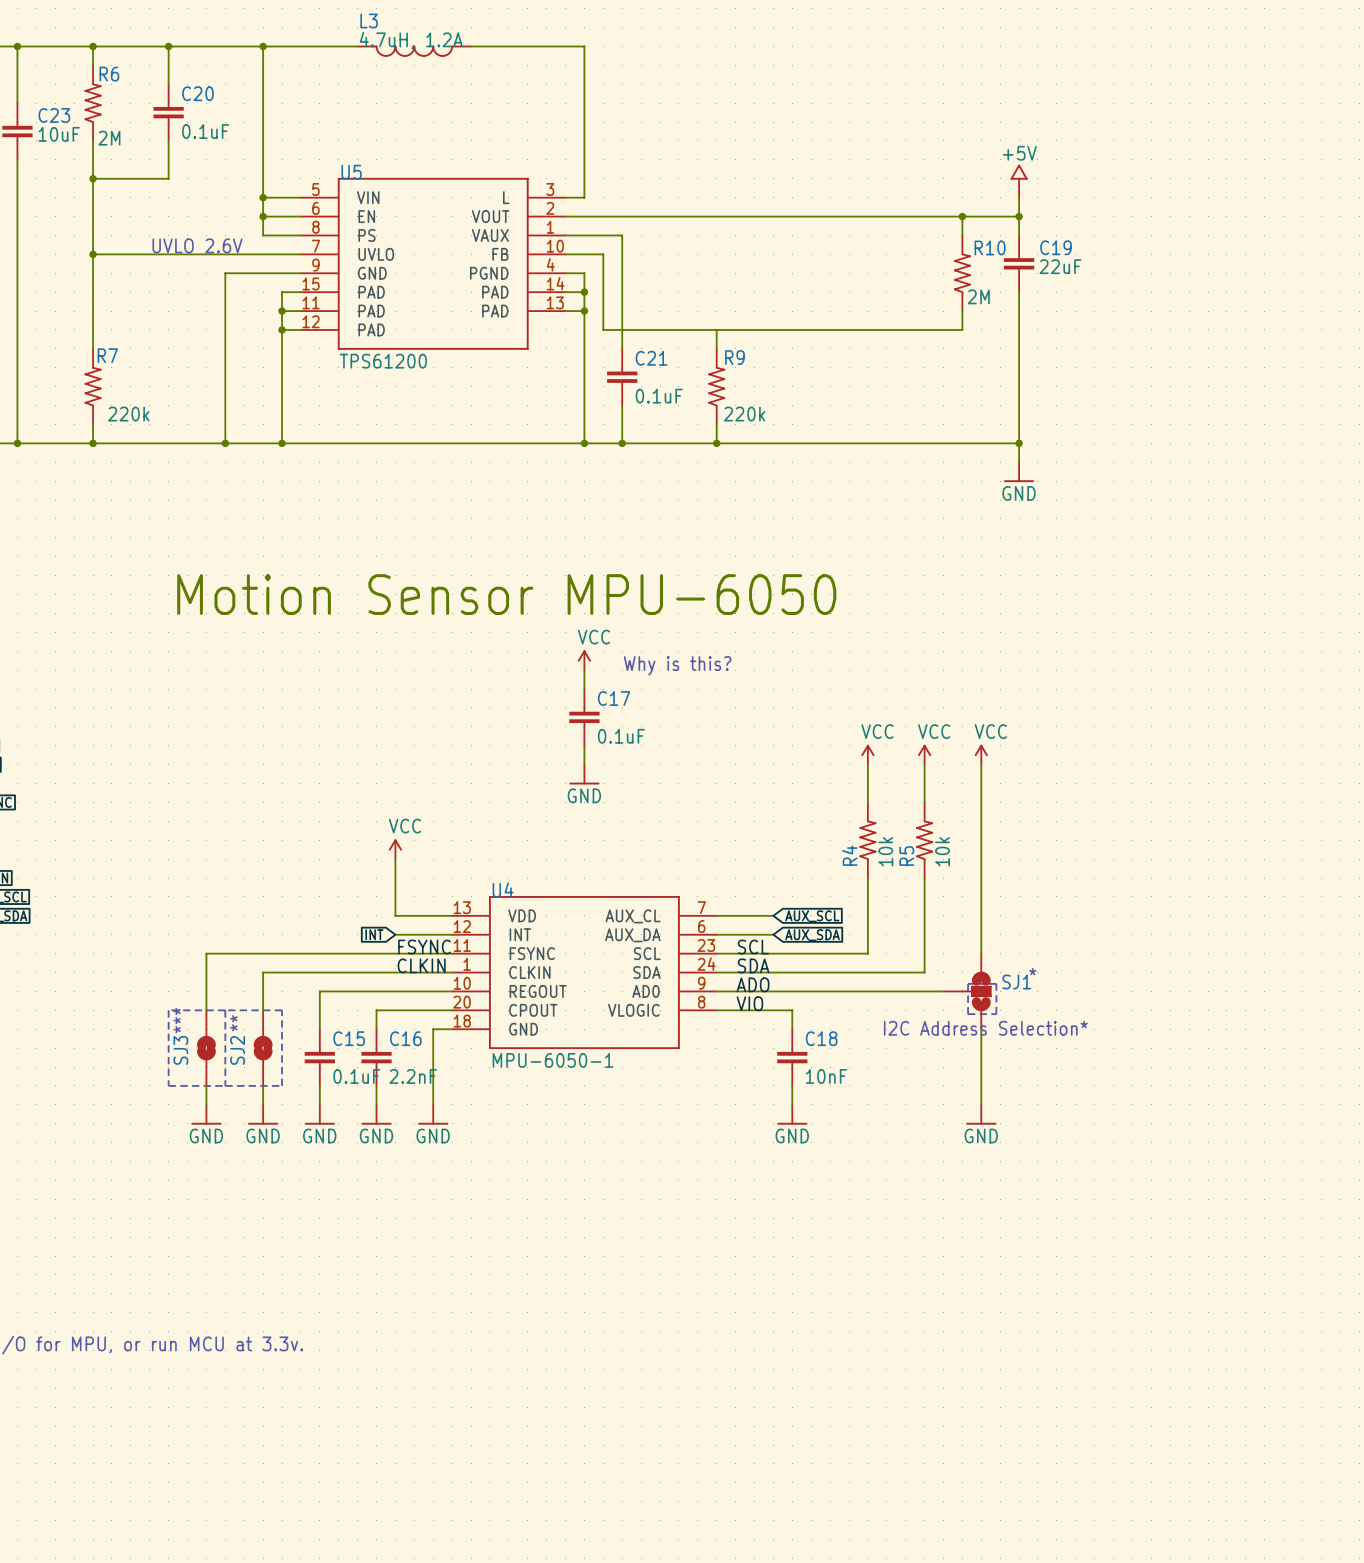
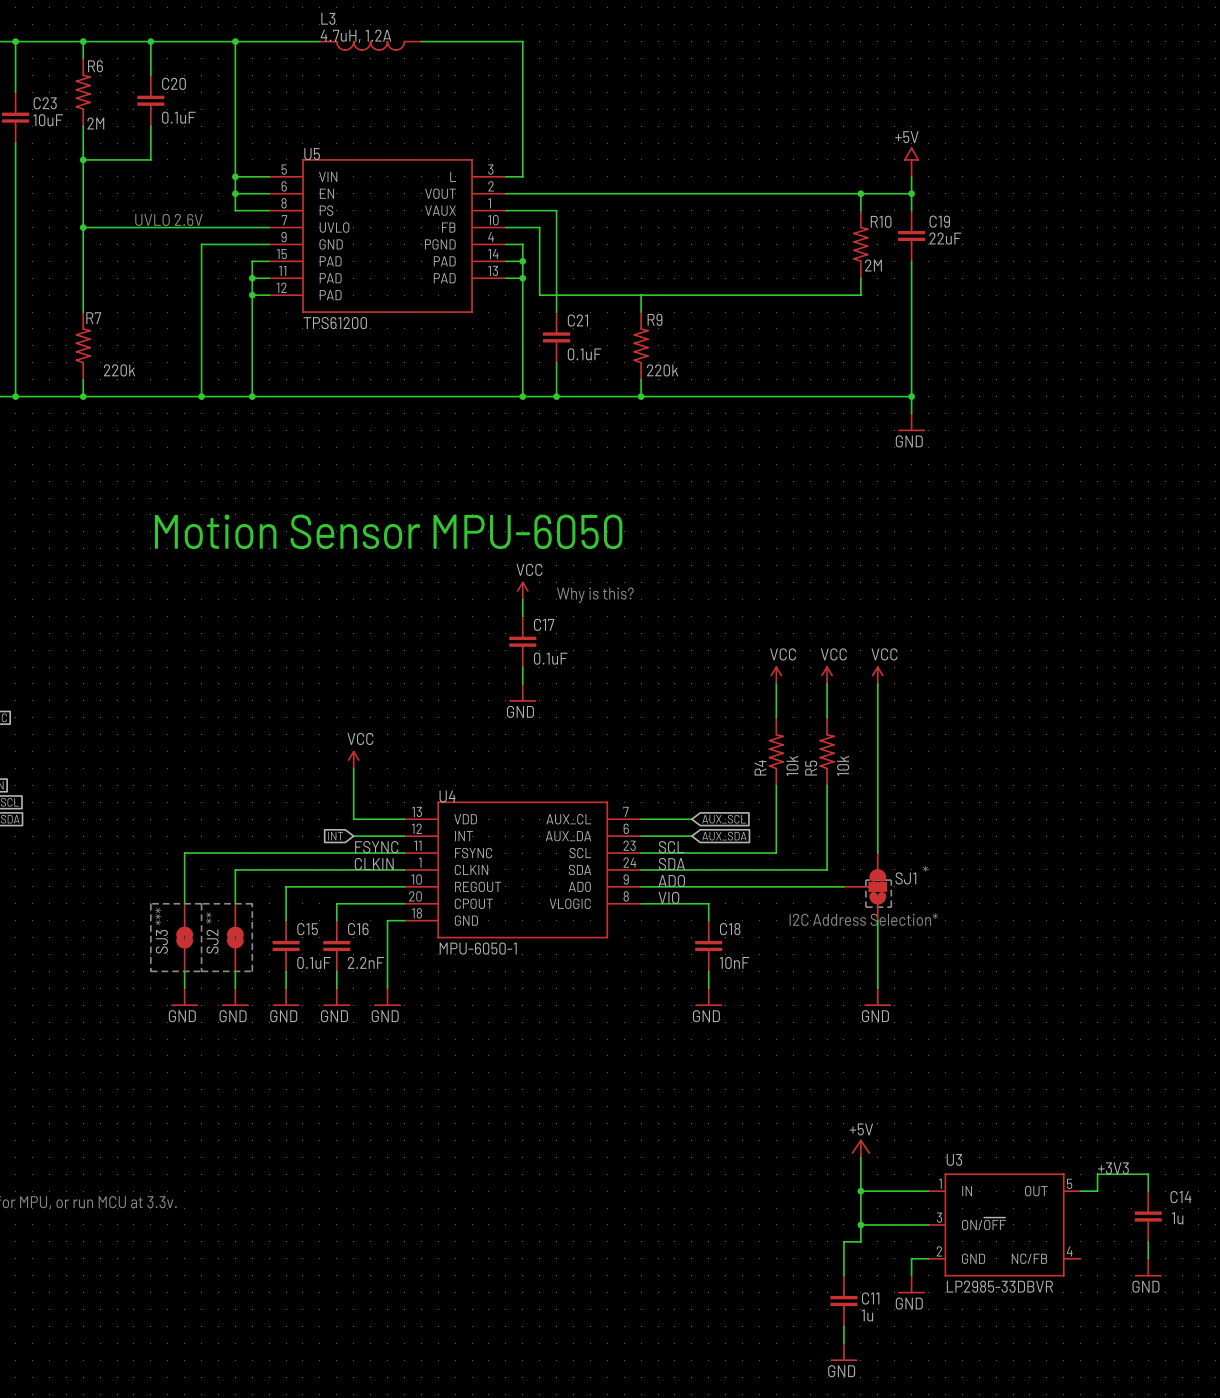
power symbol: none -> +5V (860, 1148)
wire: none -> (860, 1157) (860, 1241) (843, 1241) (843, 1275)
label: none -> +3V3 (1113, 1168)
wire: none -> (860, 1191) (928, 1191)
junction: none -> (860, 1191)
wire: none -> (1080, 1191) (1097, 1191) (1097, 1174) (1148, 1174) (1148, 1191)
C14: none -> 1u (1148, 1216)
wire: none -> (860, 1224) (928, 1224)
junction: none -> (860, 1224)
U3: none -> LP2985-33DBVR (1004, 1224)
wire: none -> (1148, 1241) (1148, 1258)
wire: none -> (928, 1258) (911, 1258) (911, 1275)
power symbol: none -> GND (1148, 1267)
power symbol: none -> GND (911, 1284)
C11: none -> 1u (843, 1301)
wire: none -> (843, 1326) (843, 1343)
power symbol: none -> GND (843, 1352)

